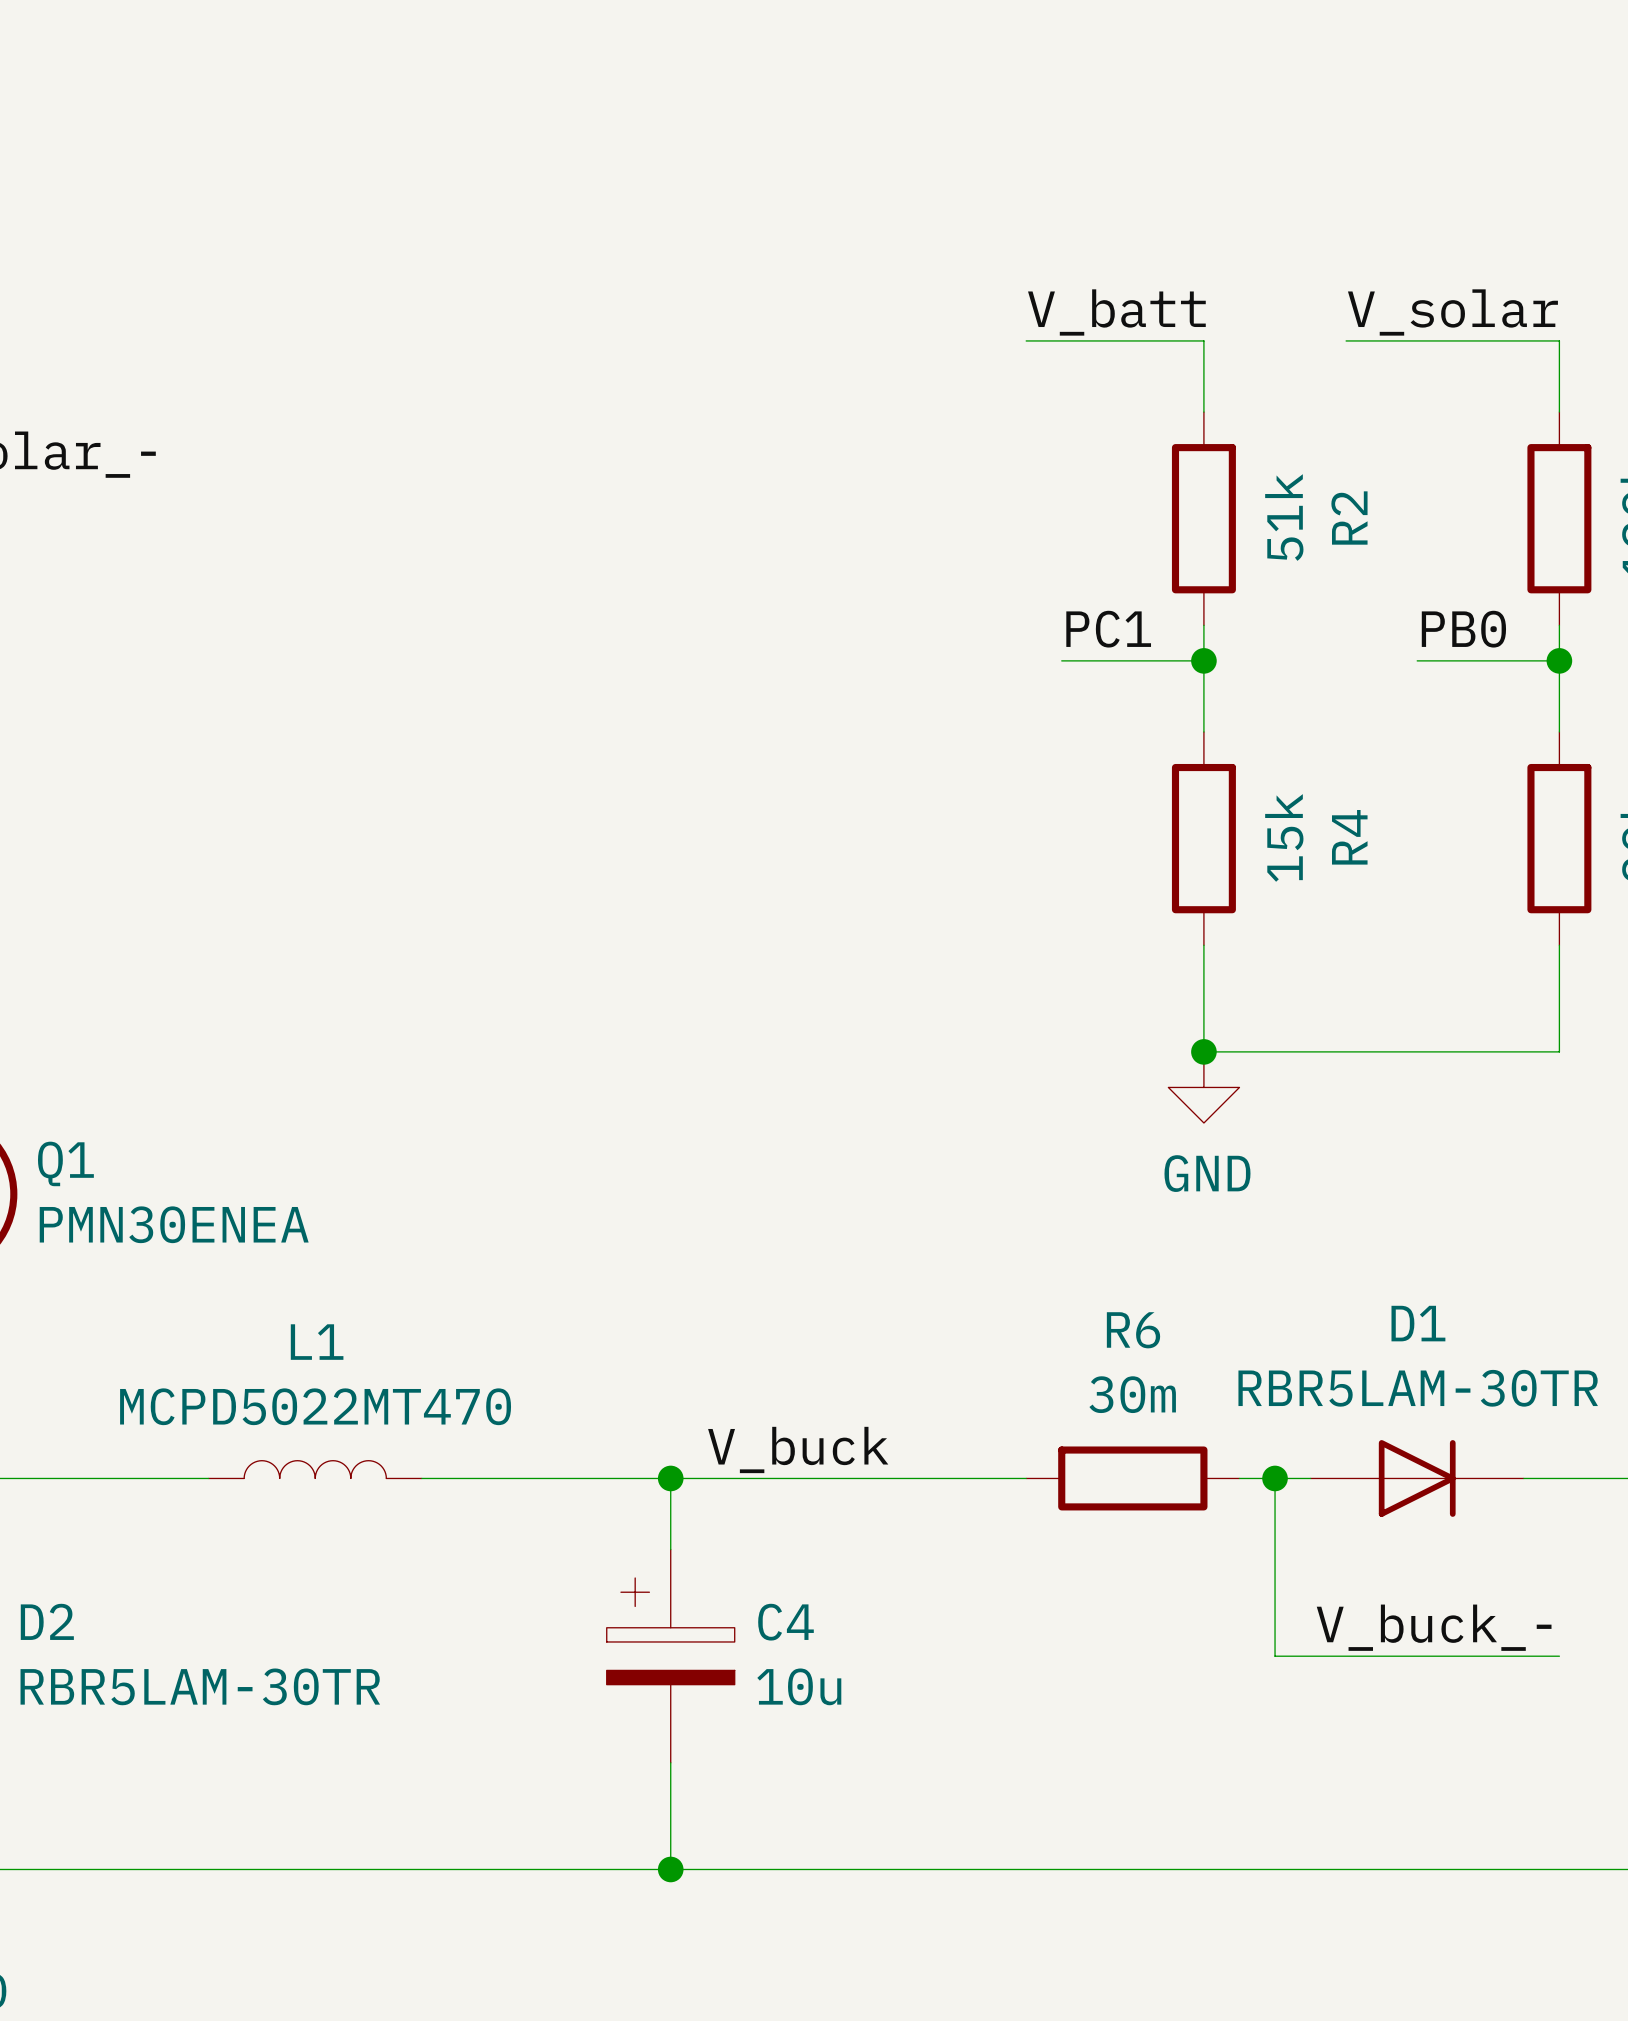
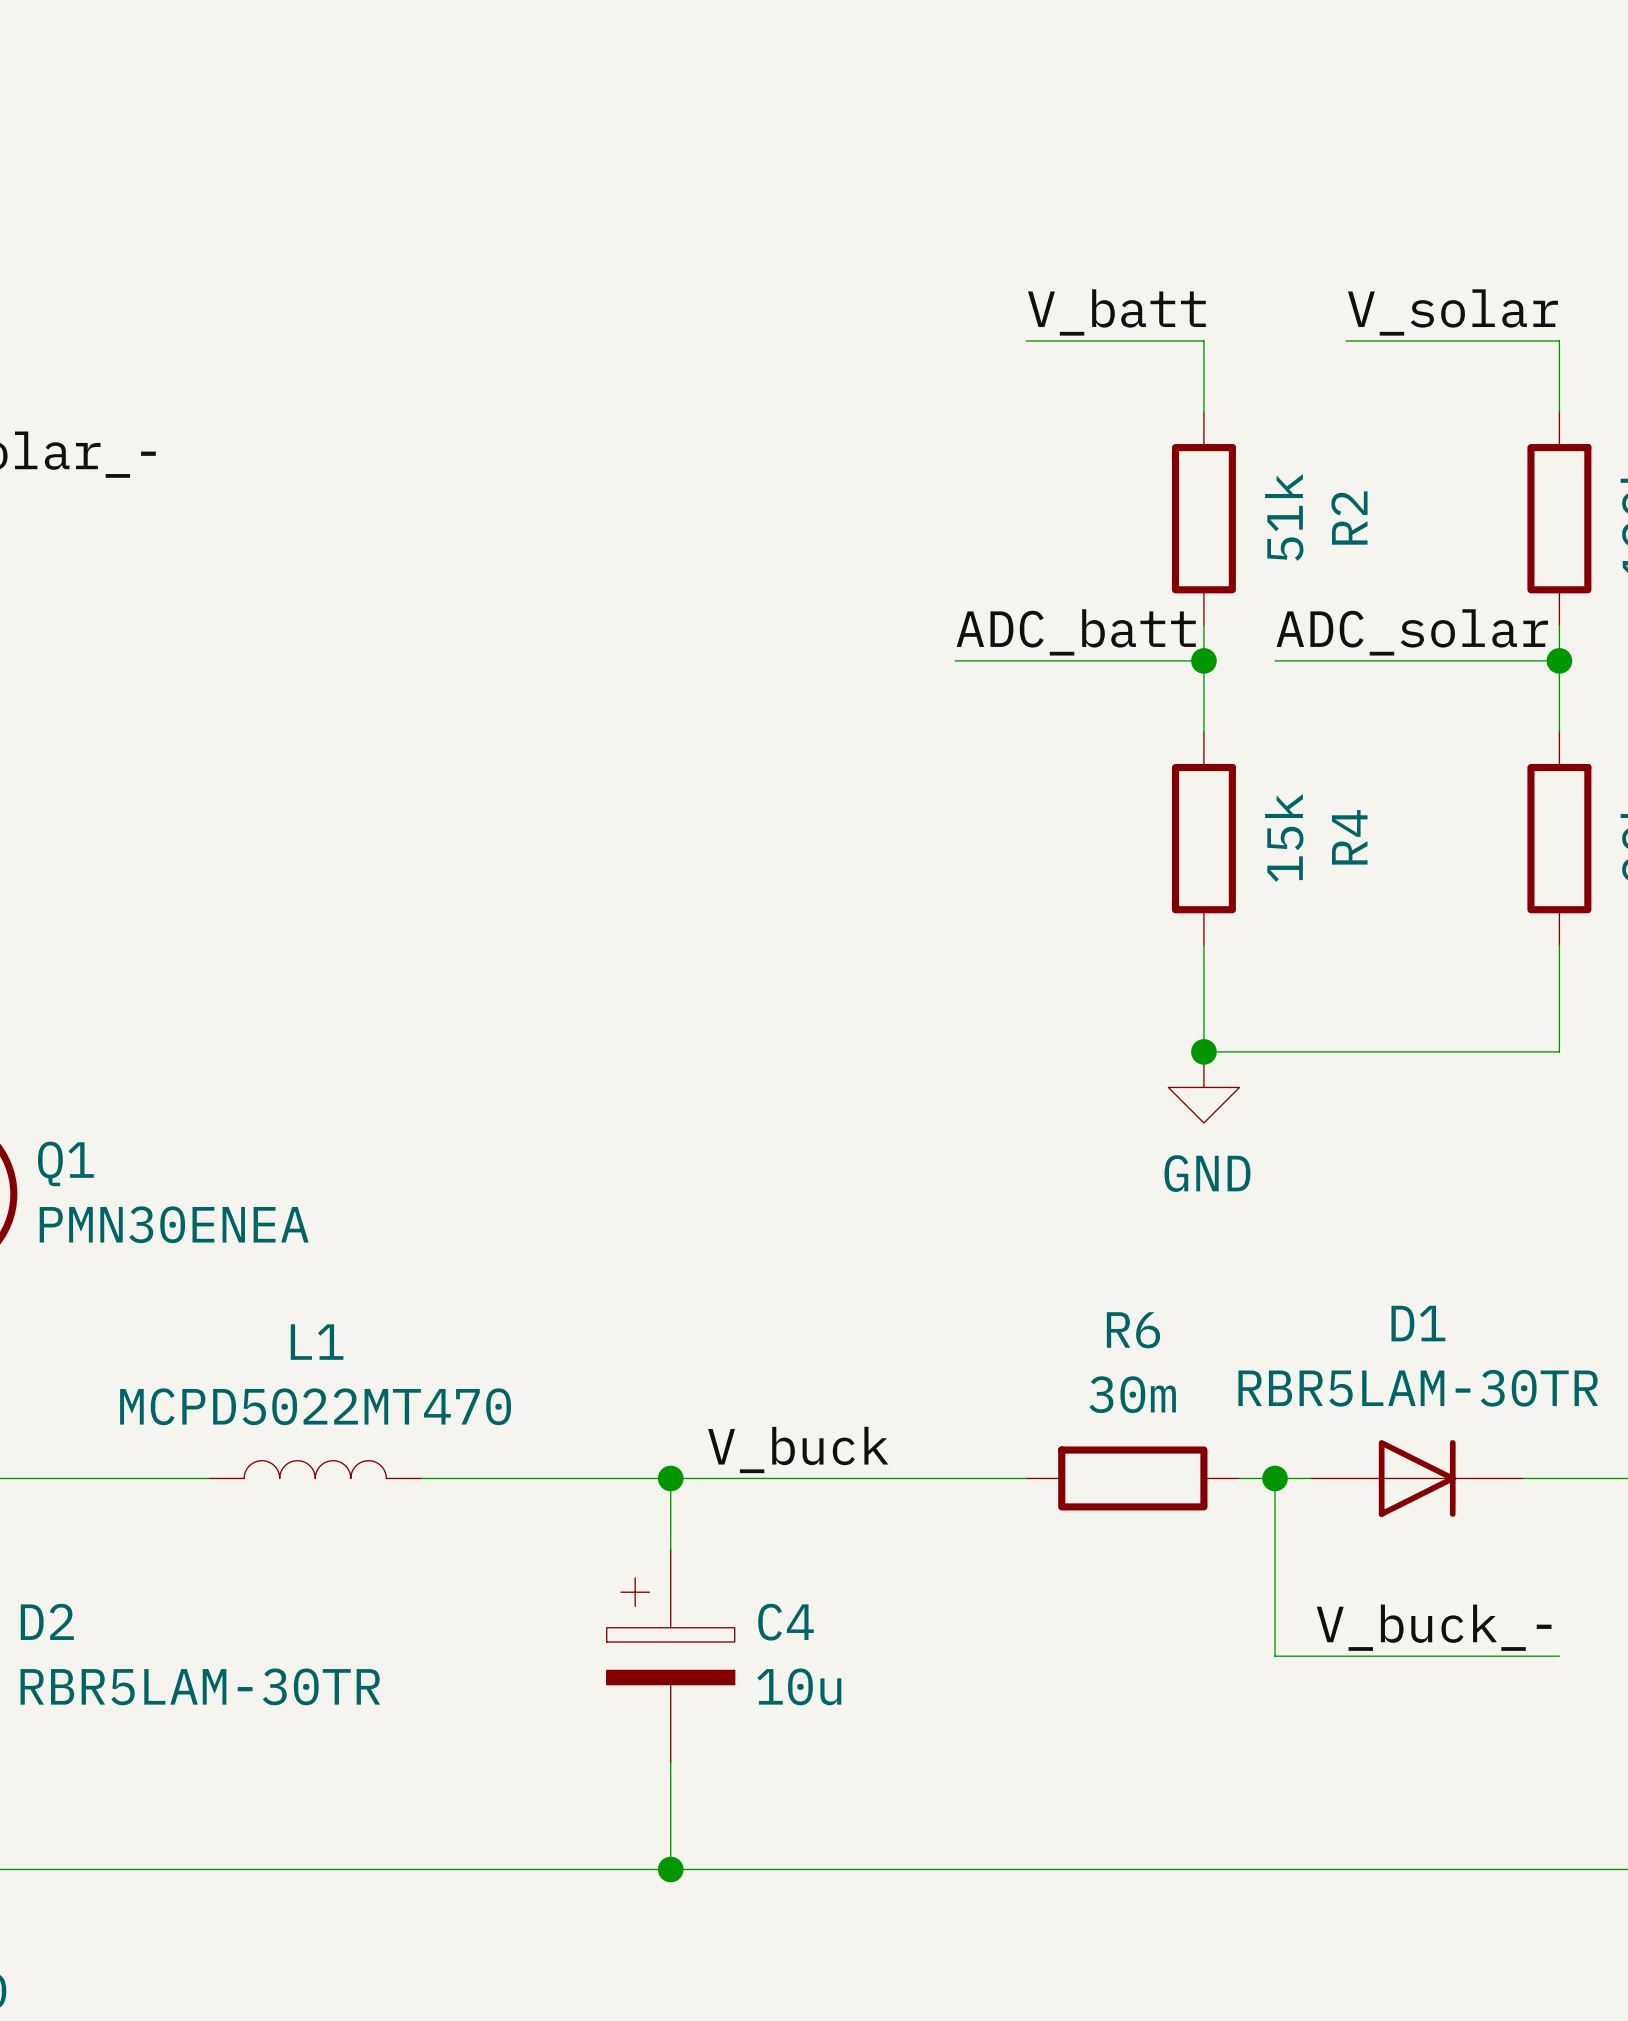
label: PC1 (1108, 629) -> none
label: PB0 (1463, 629) -> none
label: none -> ADC_batt (1076, 632)
label: none -> ADC_solar (1412, 632)
wire: none -> (955, 660) (1061, 660)
wire: none -> (1275, 660) (1417, 660)

